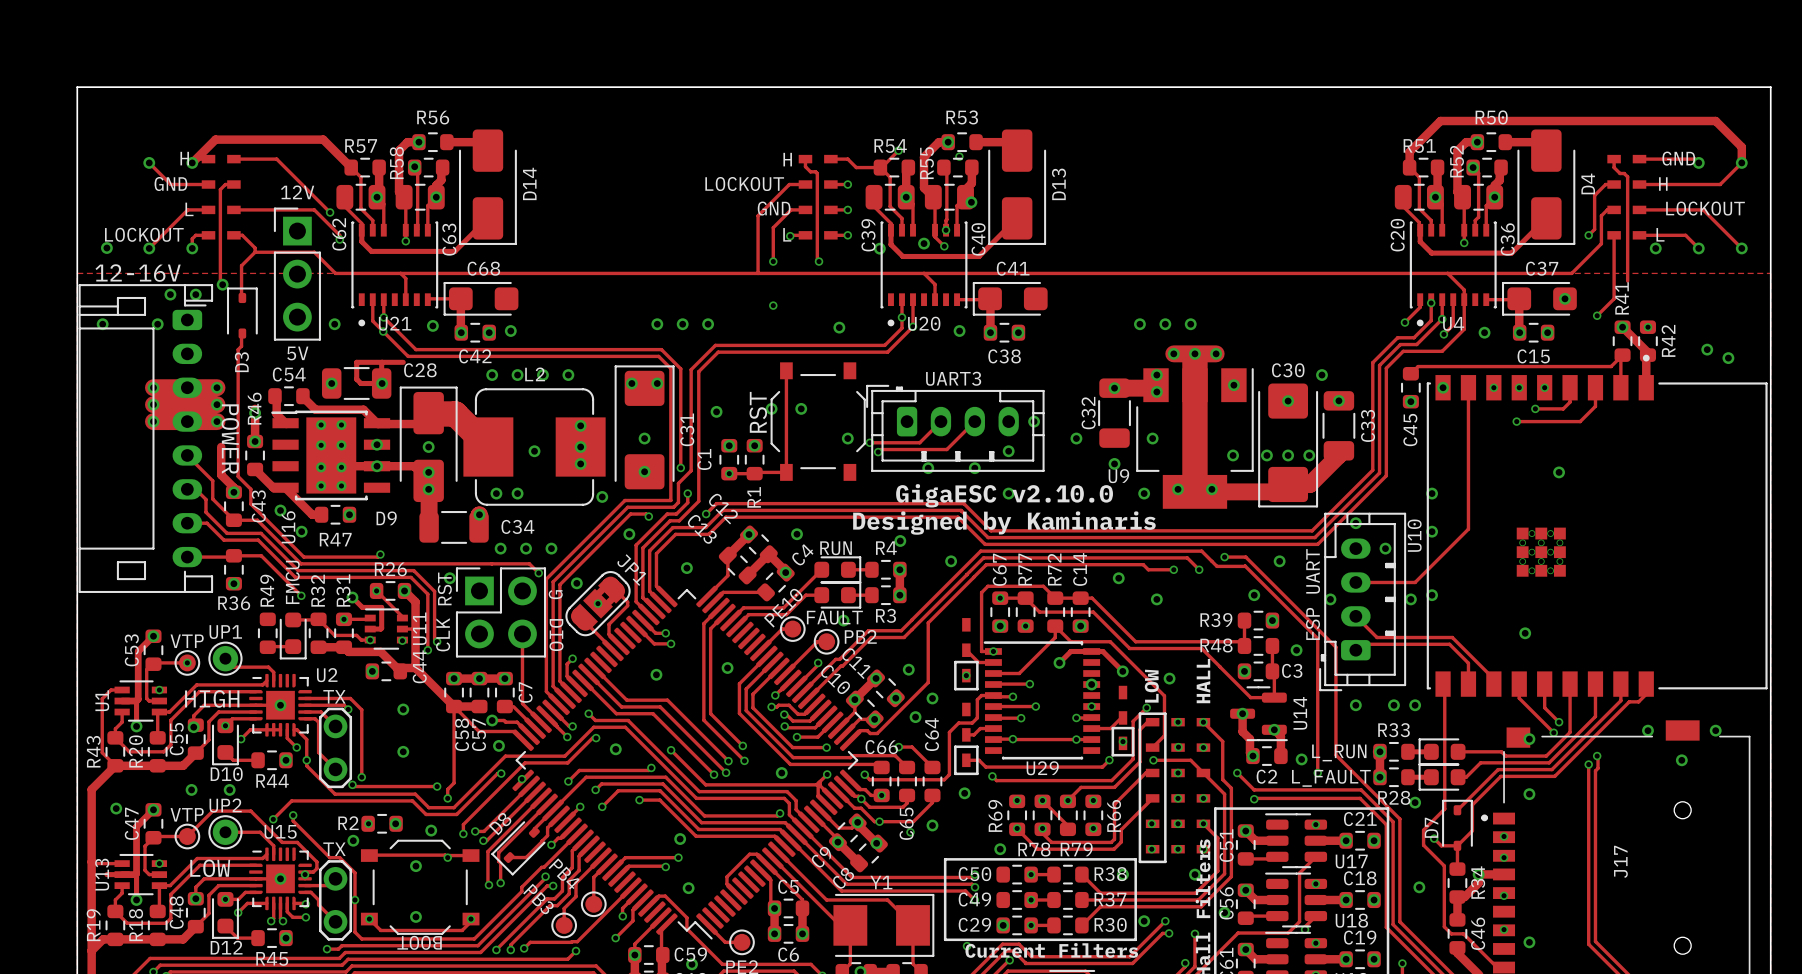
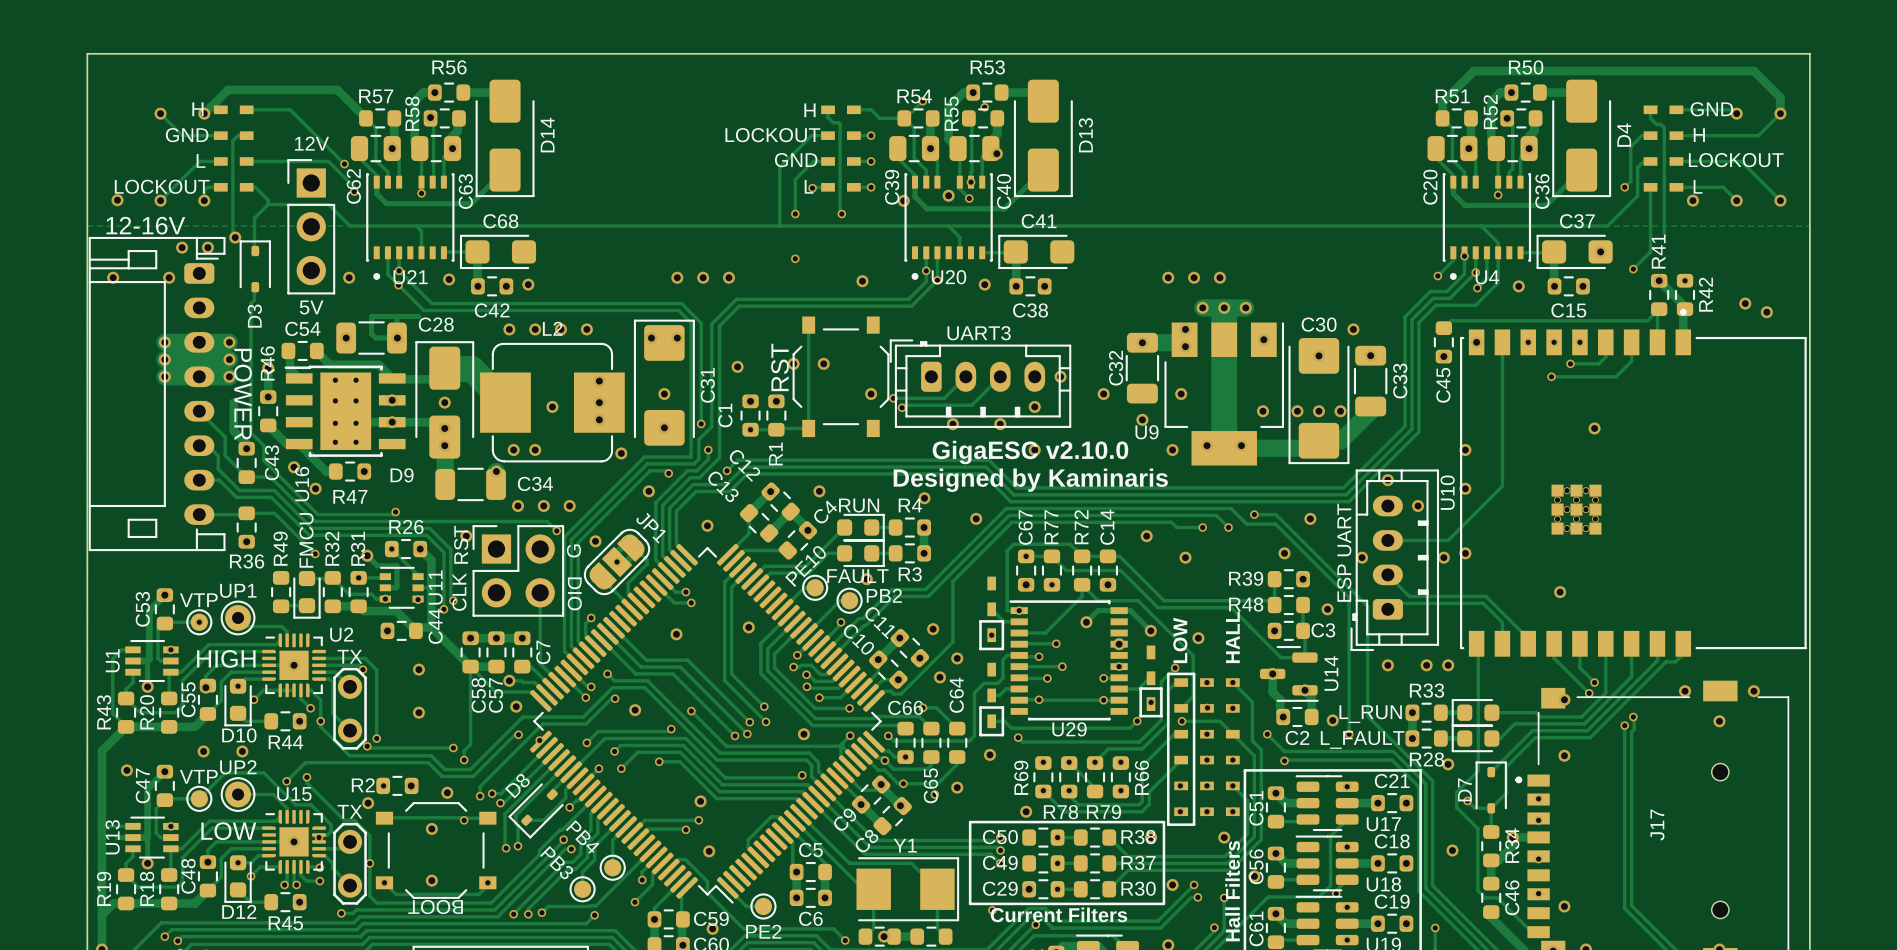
board edge: (77, 104) (77, 87) (1770, 87) (1770, 104) -> (87, 53) (1809, 53)

